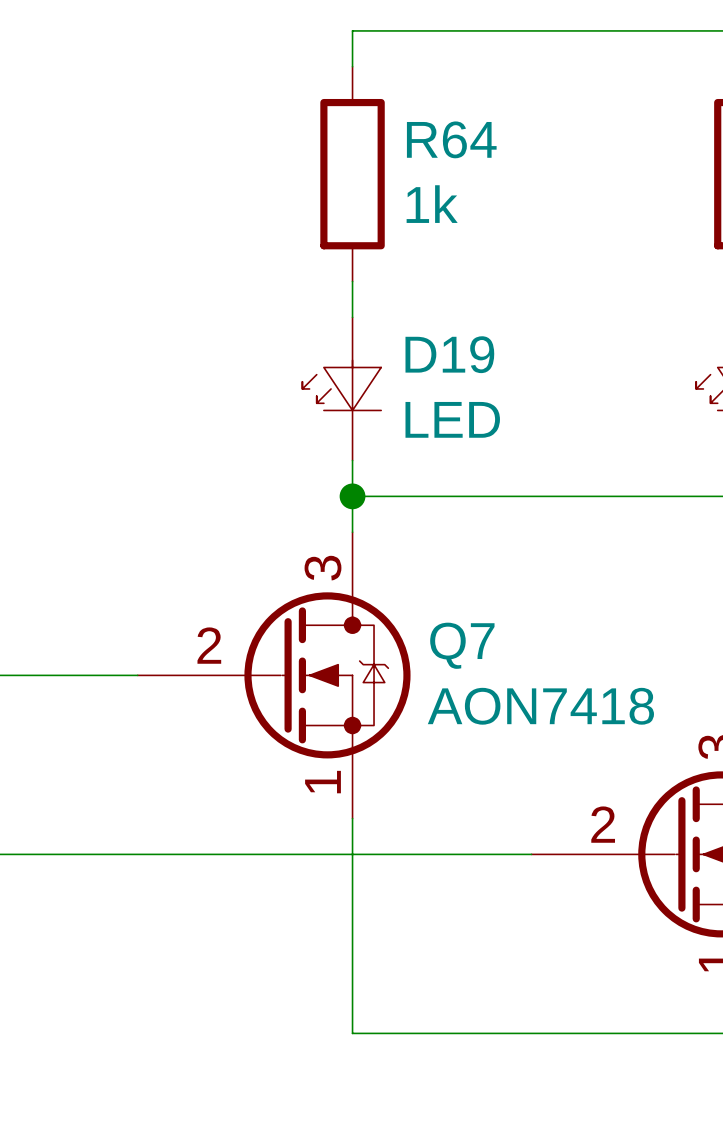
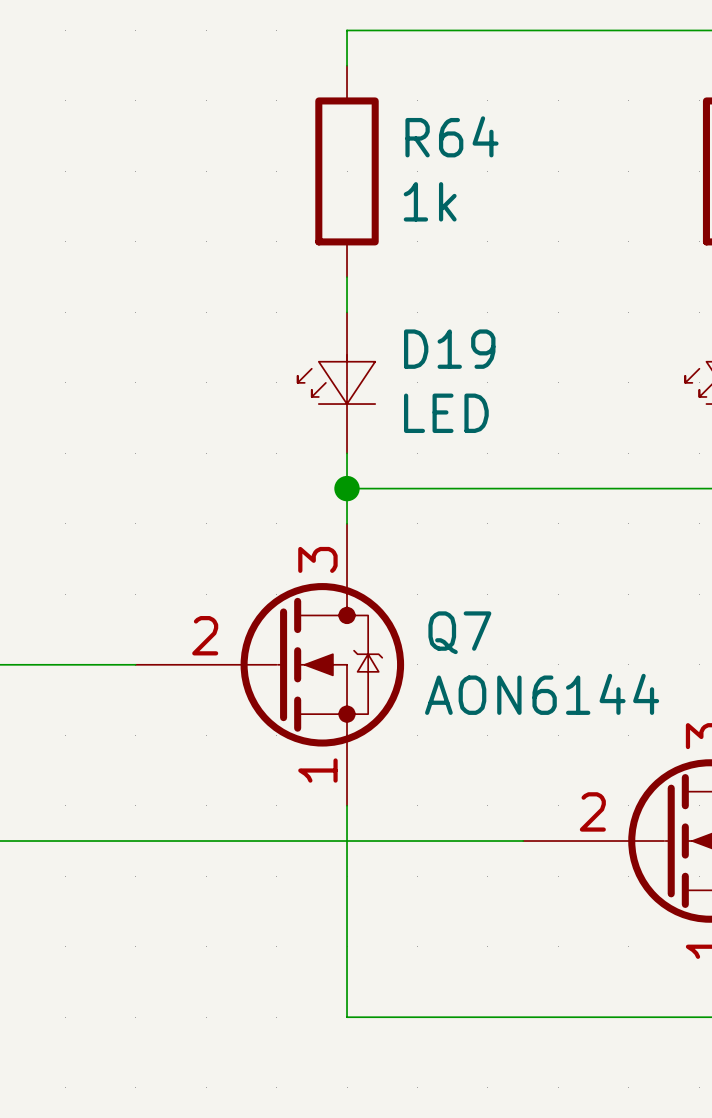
Q7 value: AON7418 (540, 706) -> AON6144 (542, 694)

